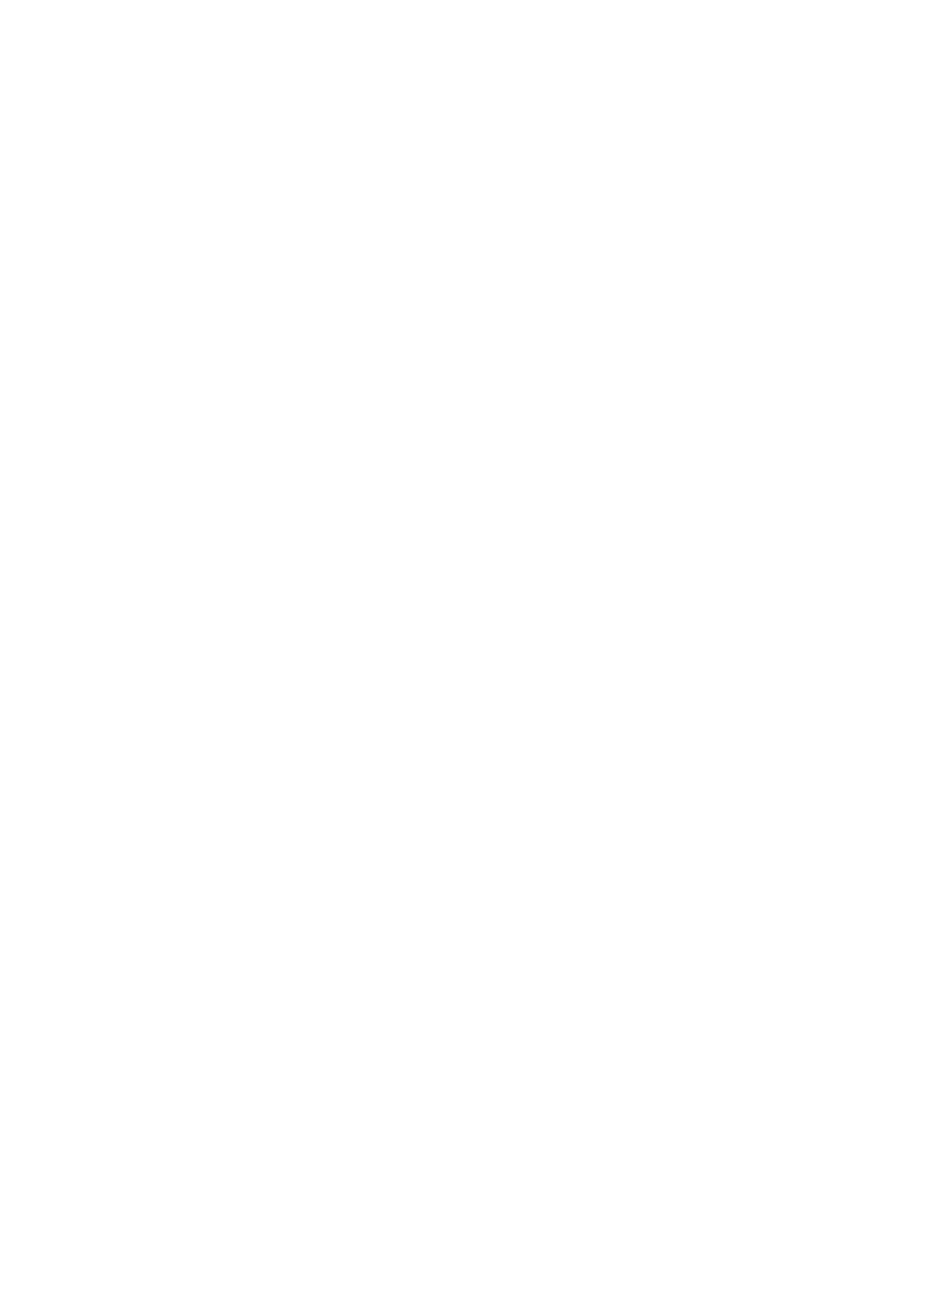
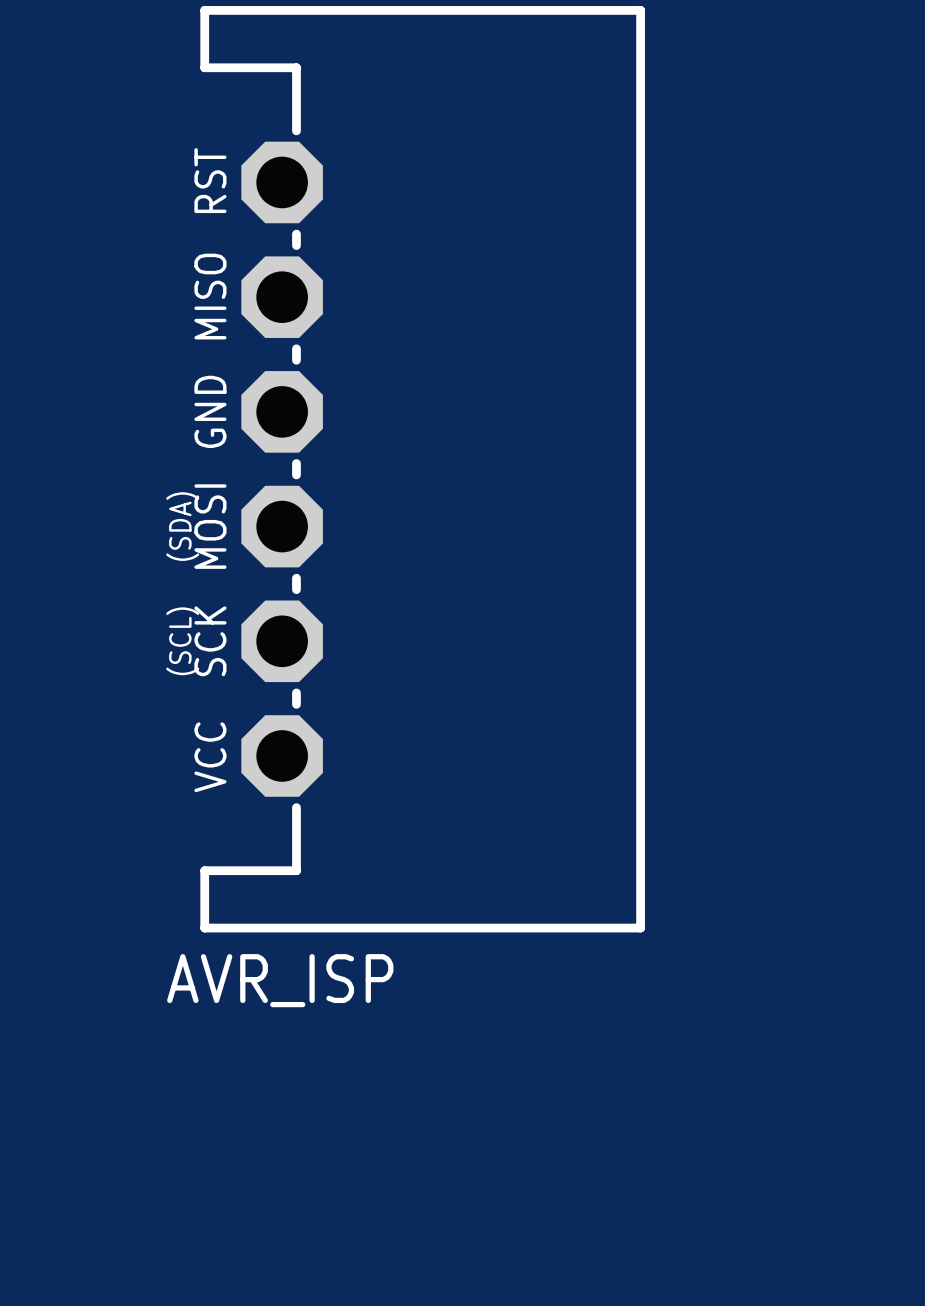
AVR_ISP: none -> (422, 469)

